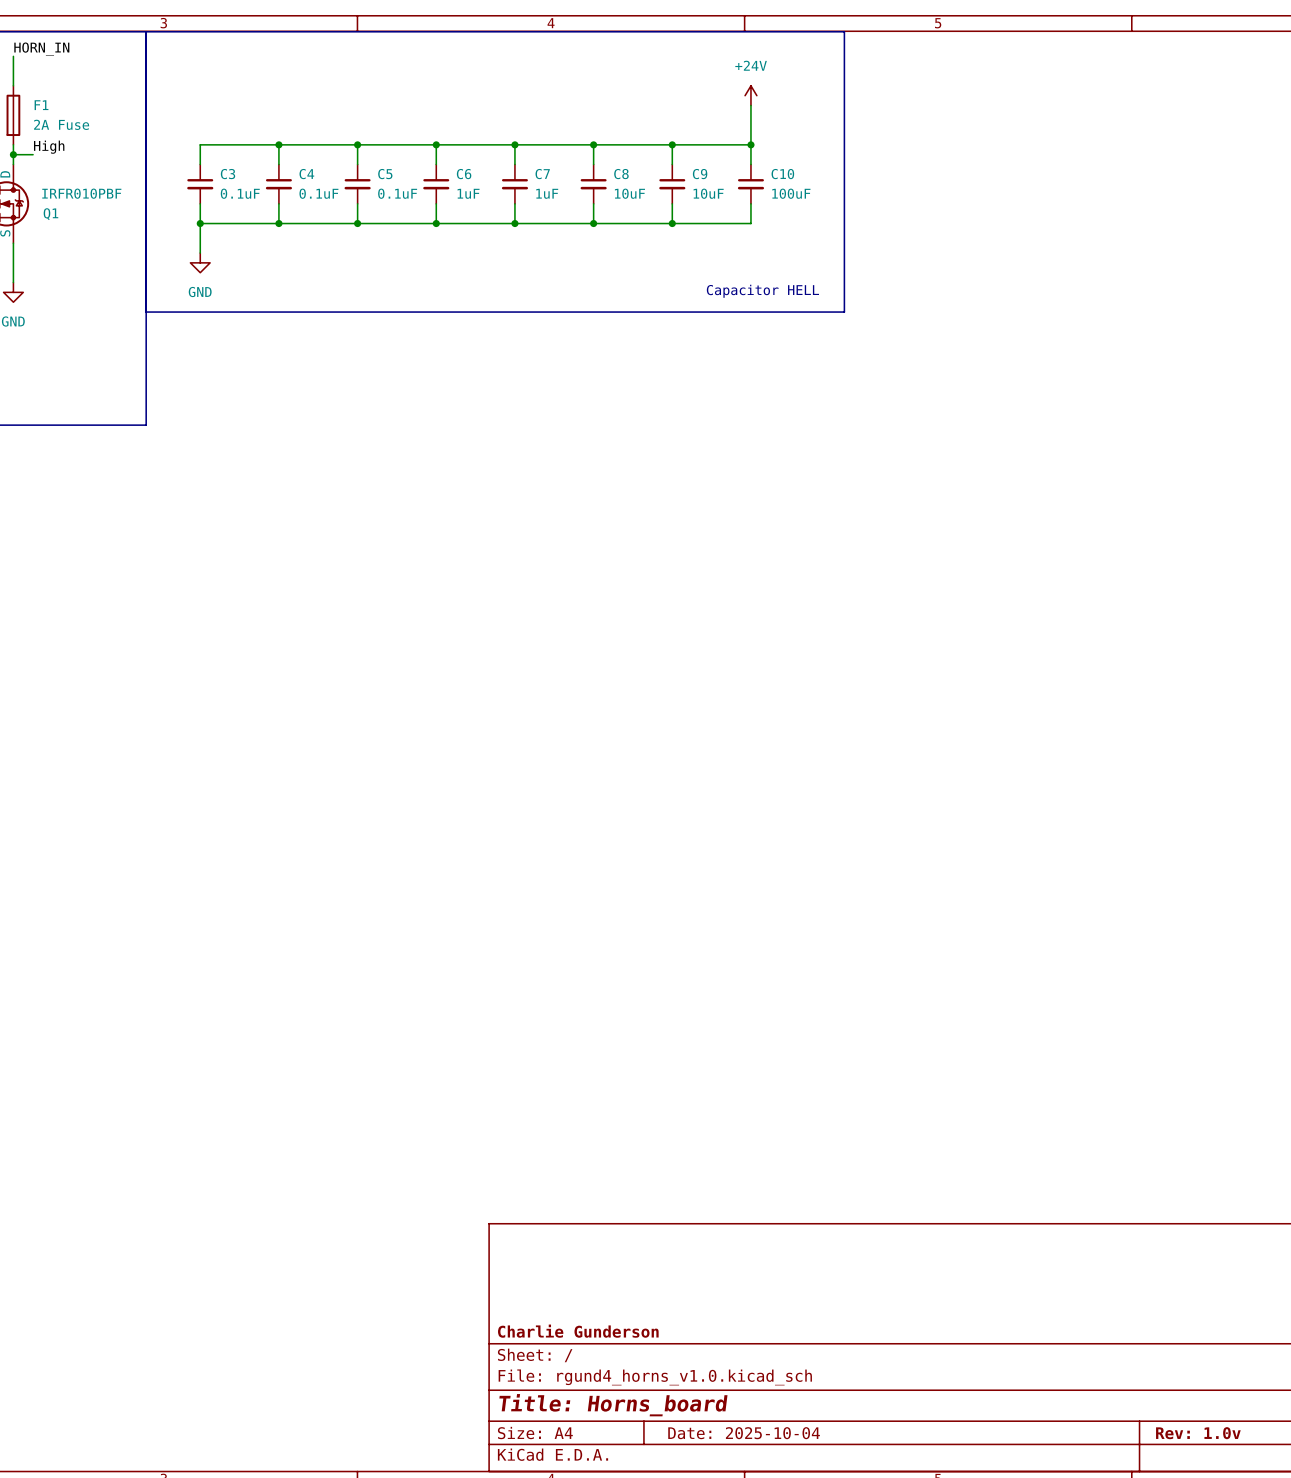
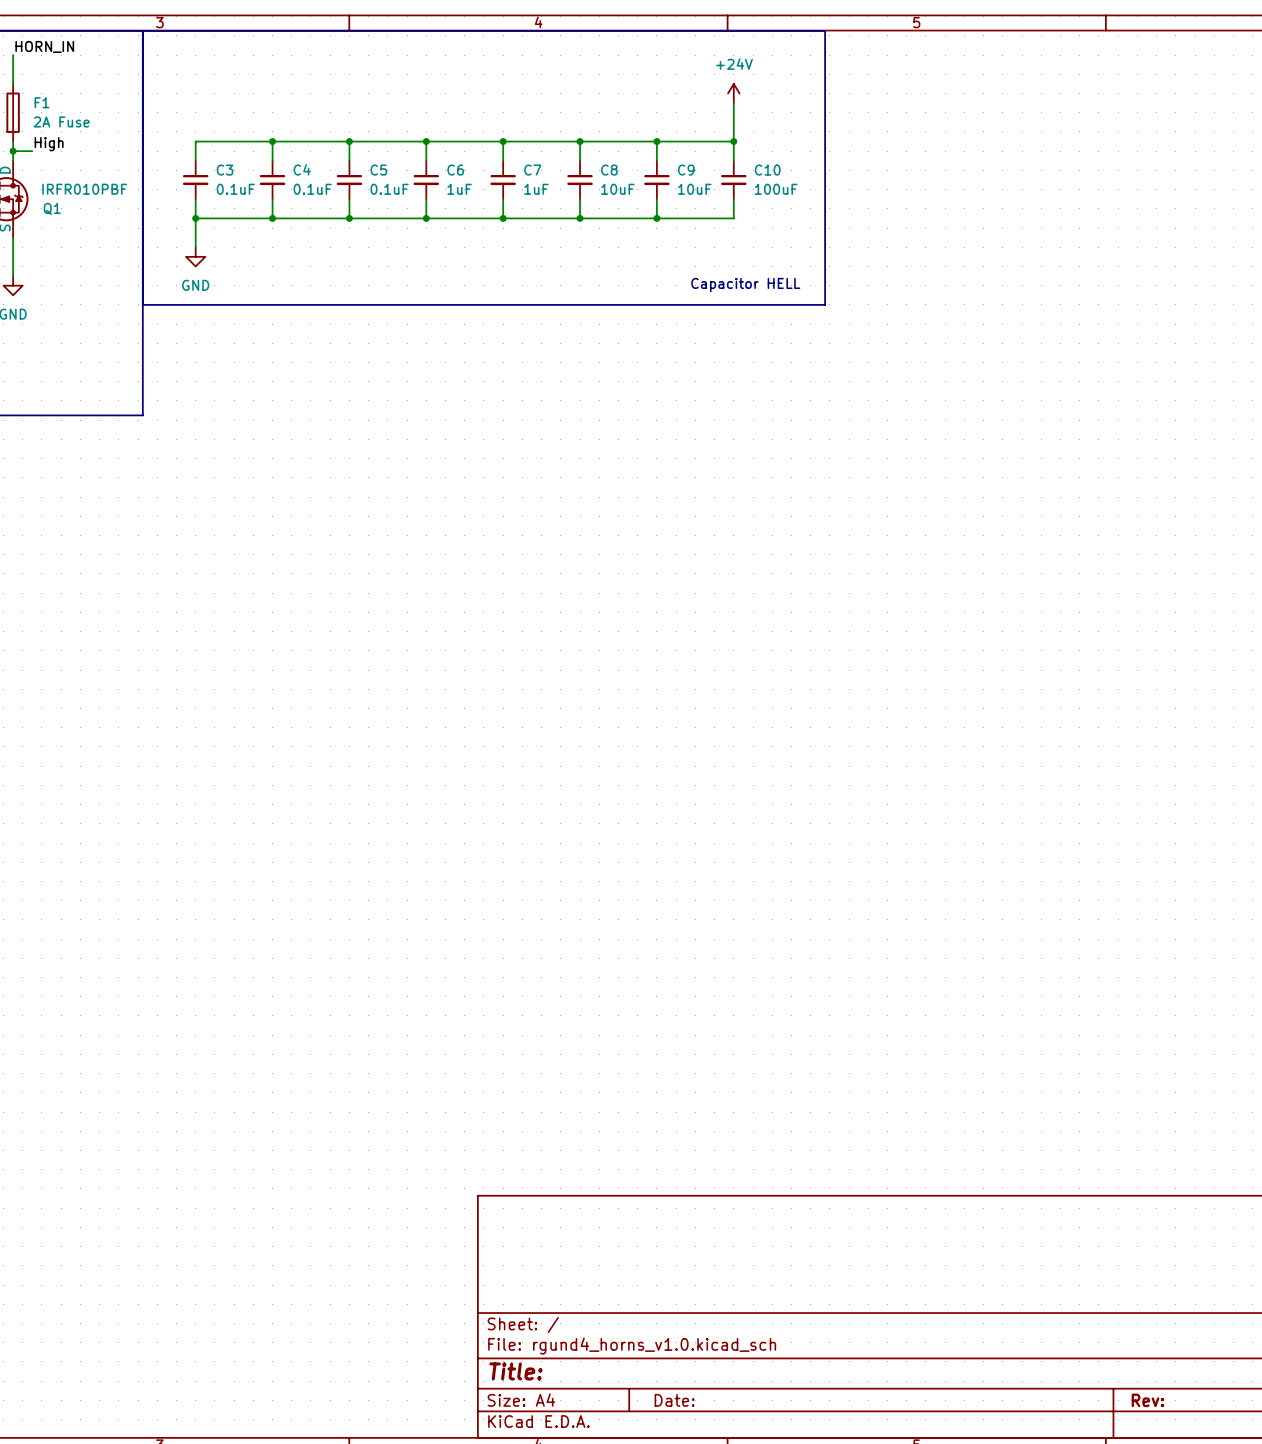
title block: Charlie Gunderson (578, 1331) -> none
title block: Title: Horns_board (613, 1405) -> Title: (515, 1371)
title block: Date: 2025-10-04 (744, 1433) -> Date: (674, 1400)
title block: Rev: 1.0v (1198, 1433) -> Rev: (1147, 1400)

